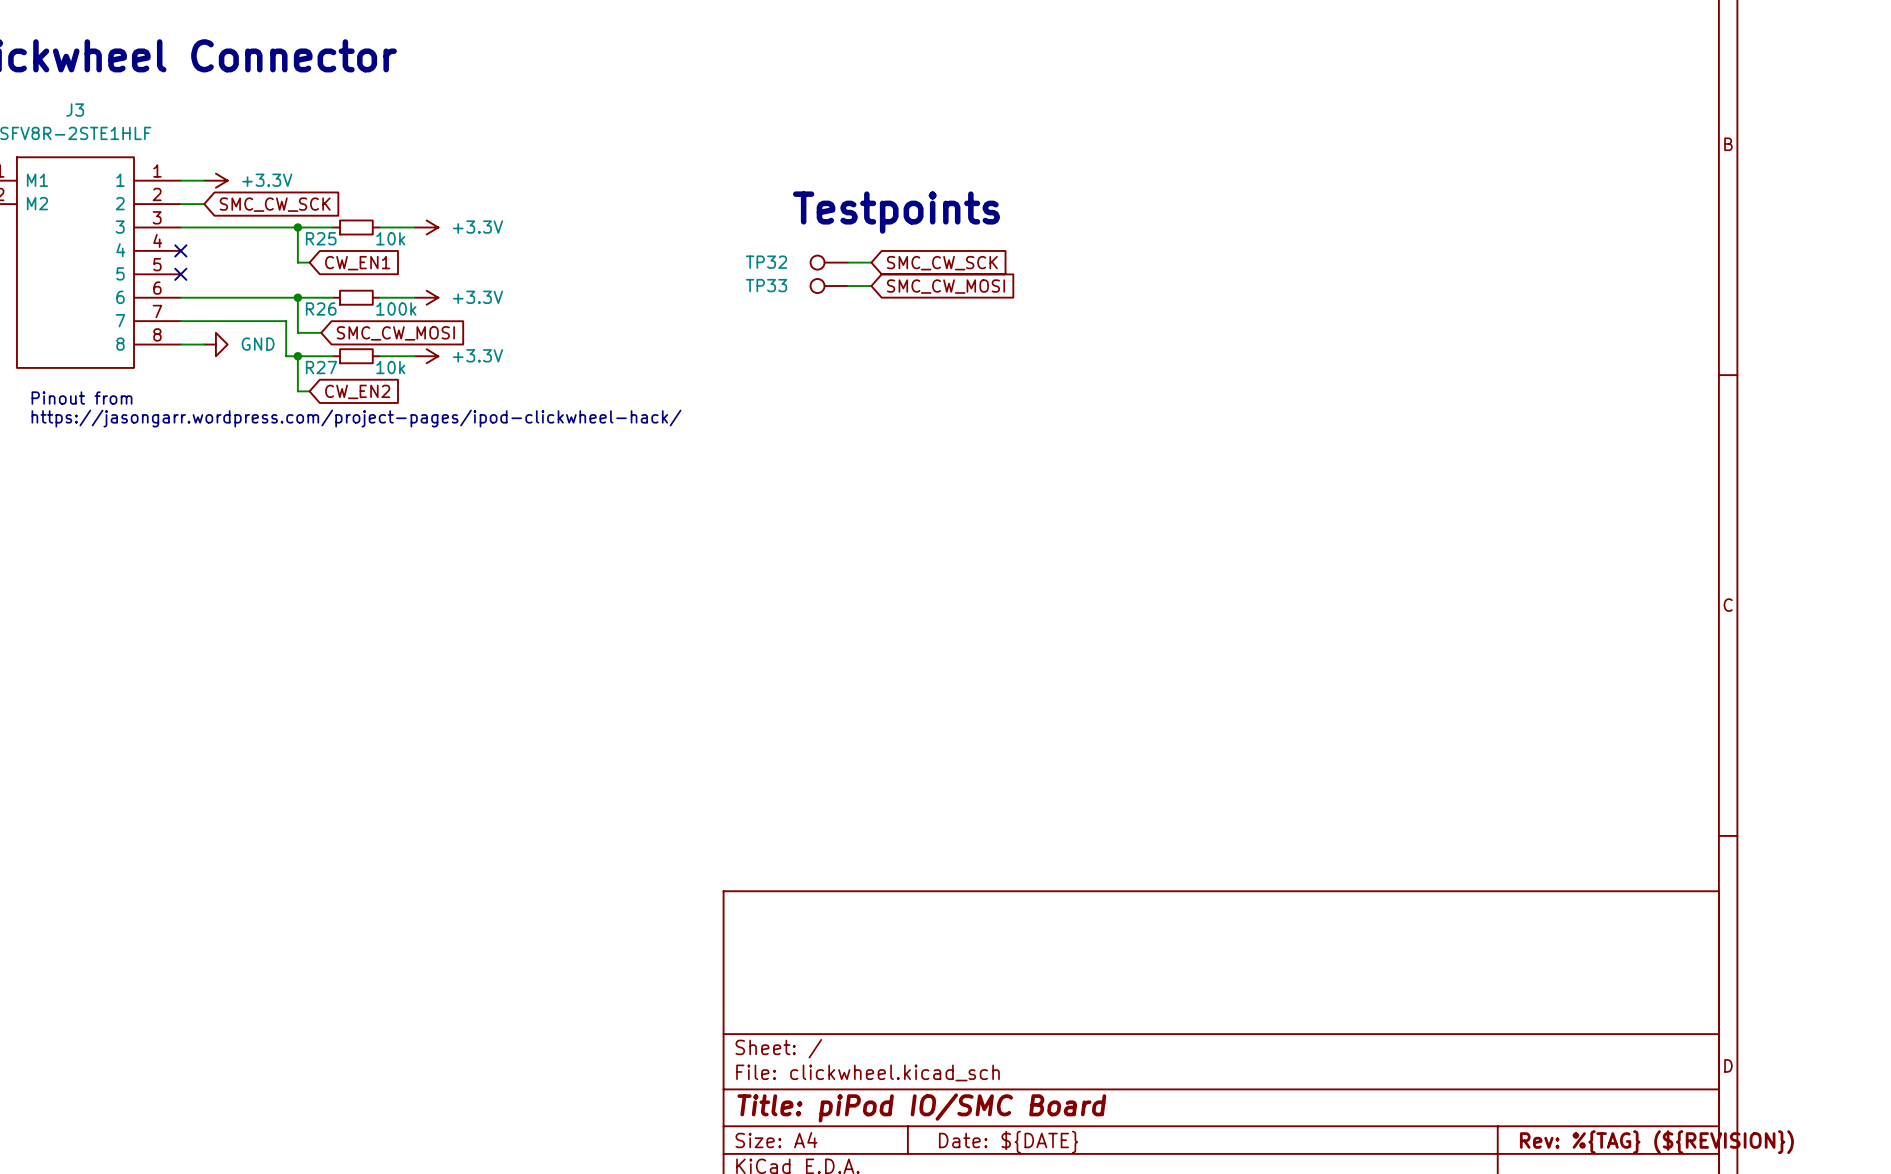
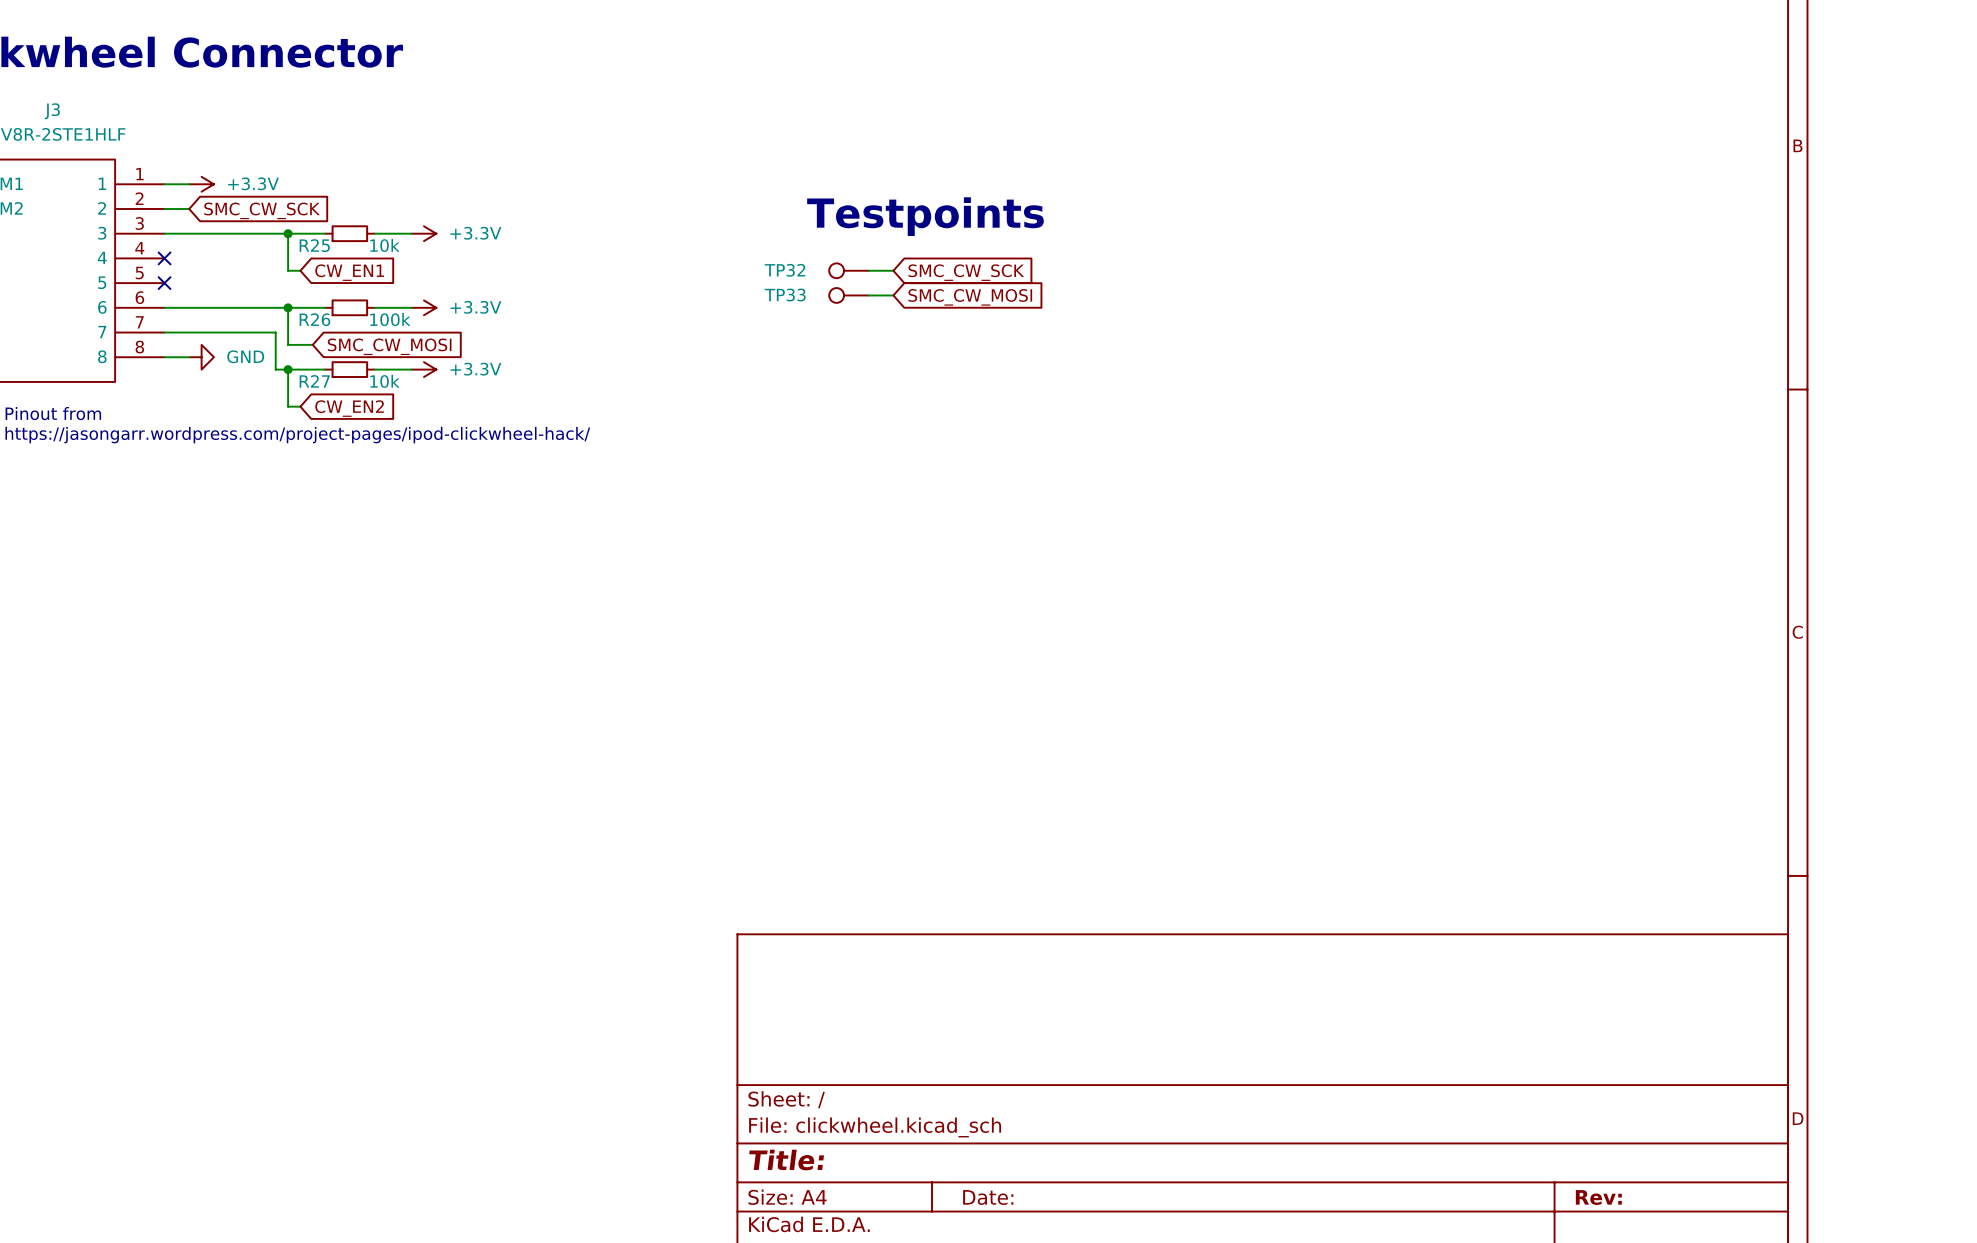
title block: Title: piPod IO/SMC Board (921, 1107) -> Title: (786, 1160)
title block: Date: ${DATE} (1008, 1142) -> Date: (988, 1197)
title block: Rev: %{TAG} (${REVISION}) (1656, 1142) -> Rev: (1598, 1197)

